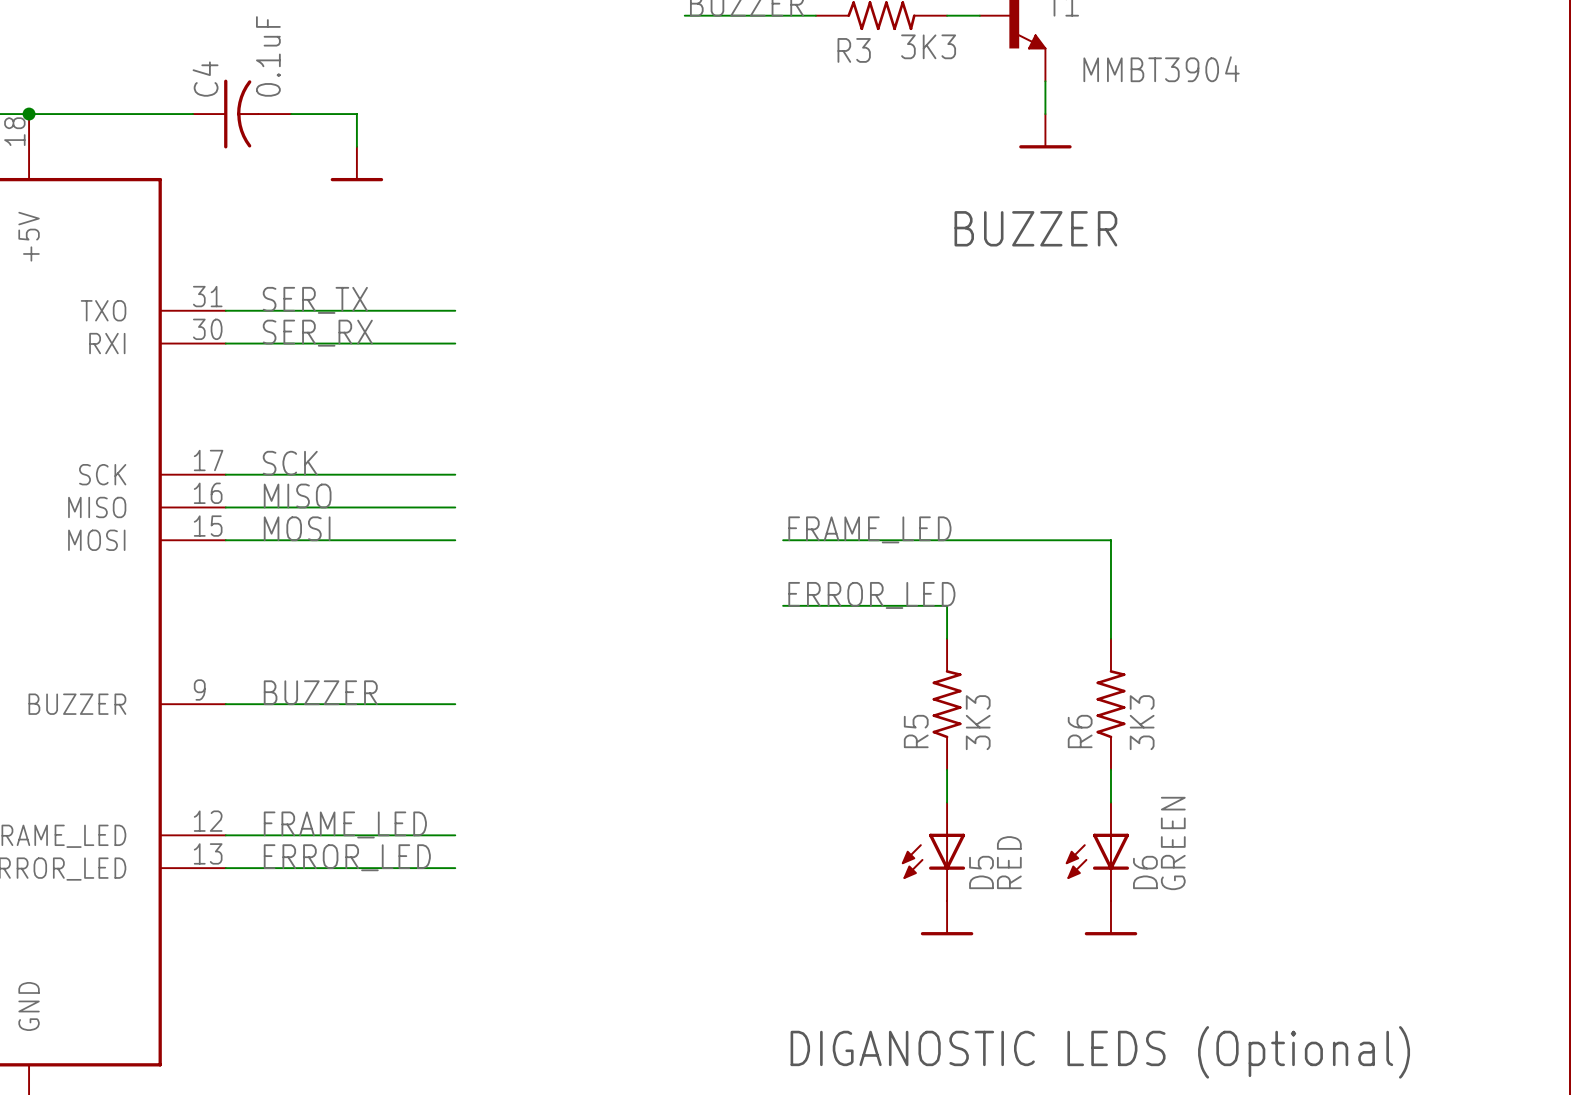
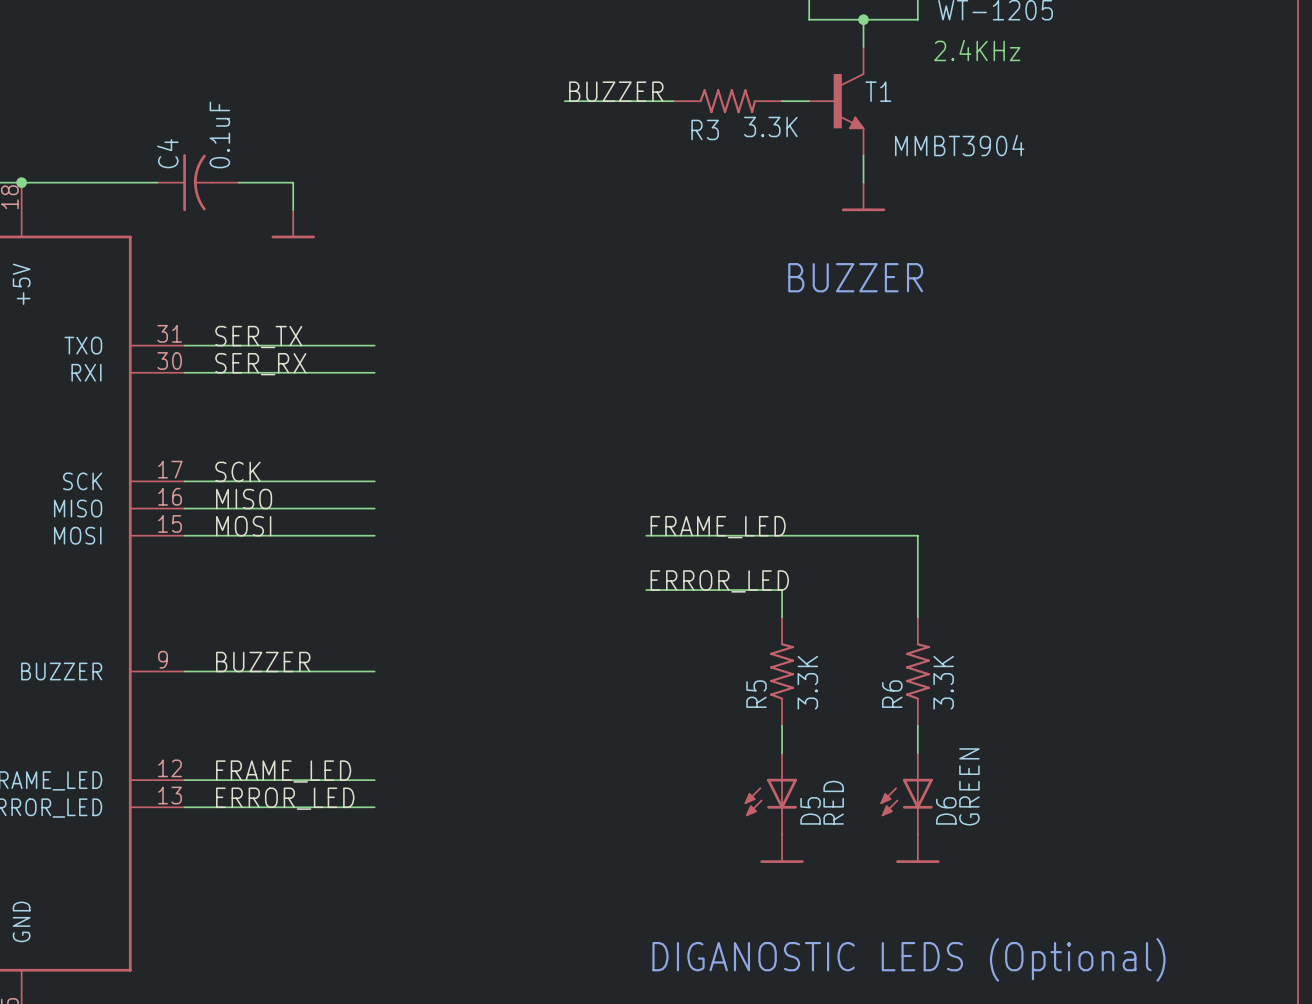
R3 value: 3K3 (928, 46) -> 3.3K (770, 126)
R5 value: 3K3 (978, 722) -> 3.3K (807, 682)
R6 value: 3K3 (1142, 722) -> 3.3K (943, 682)

